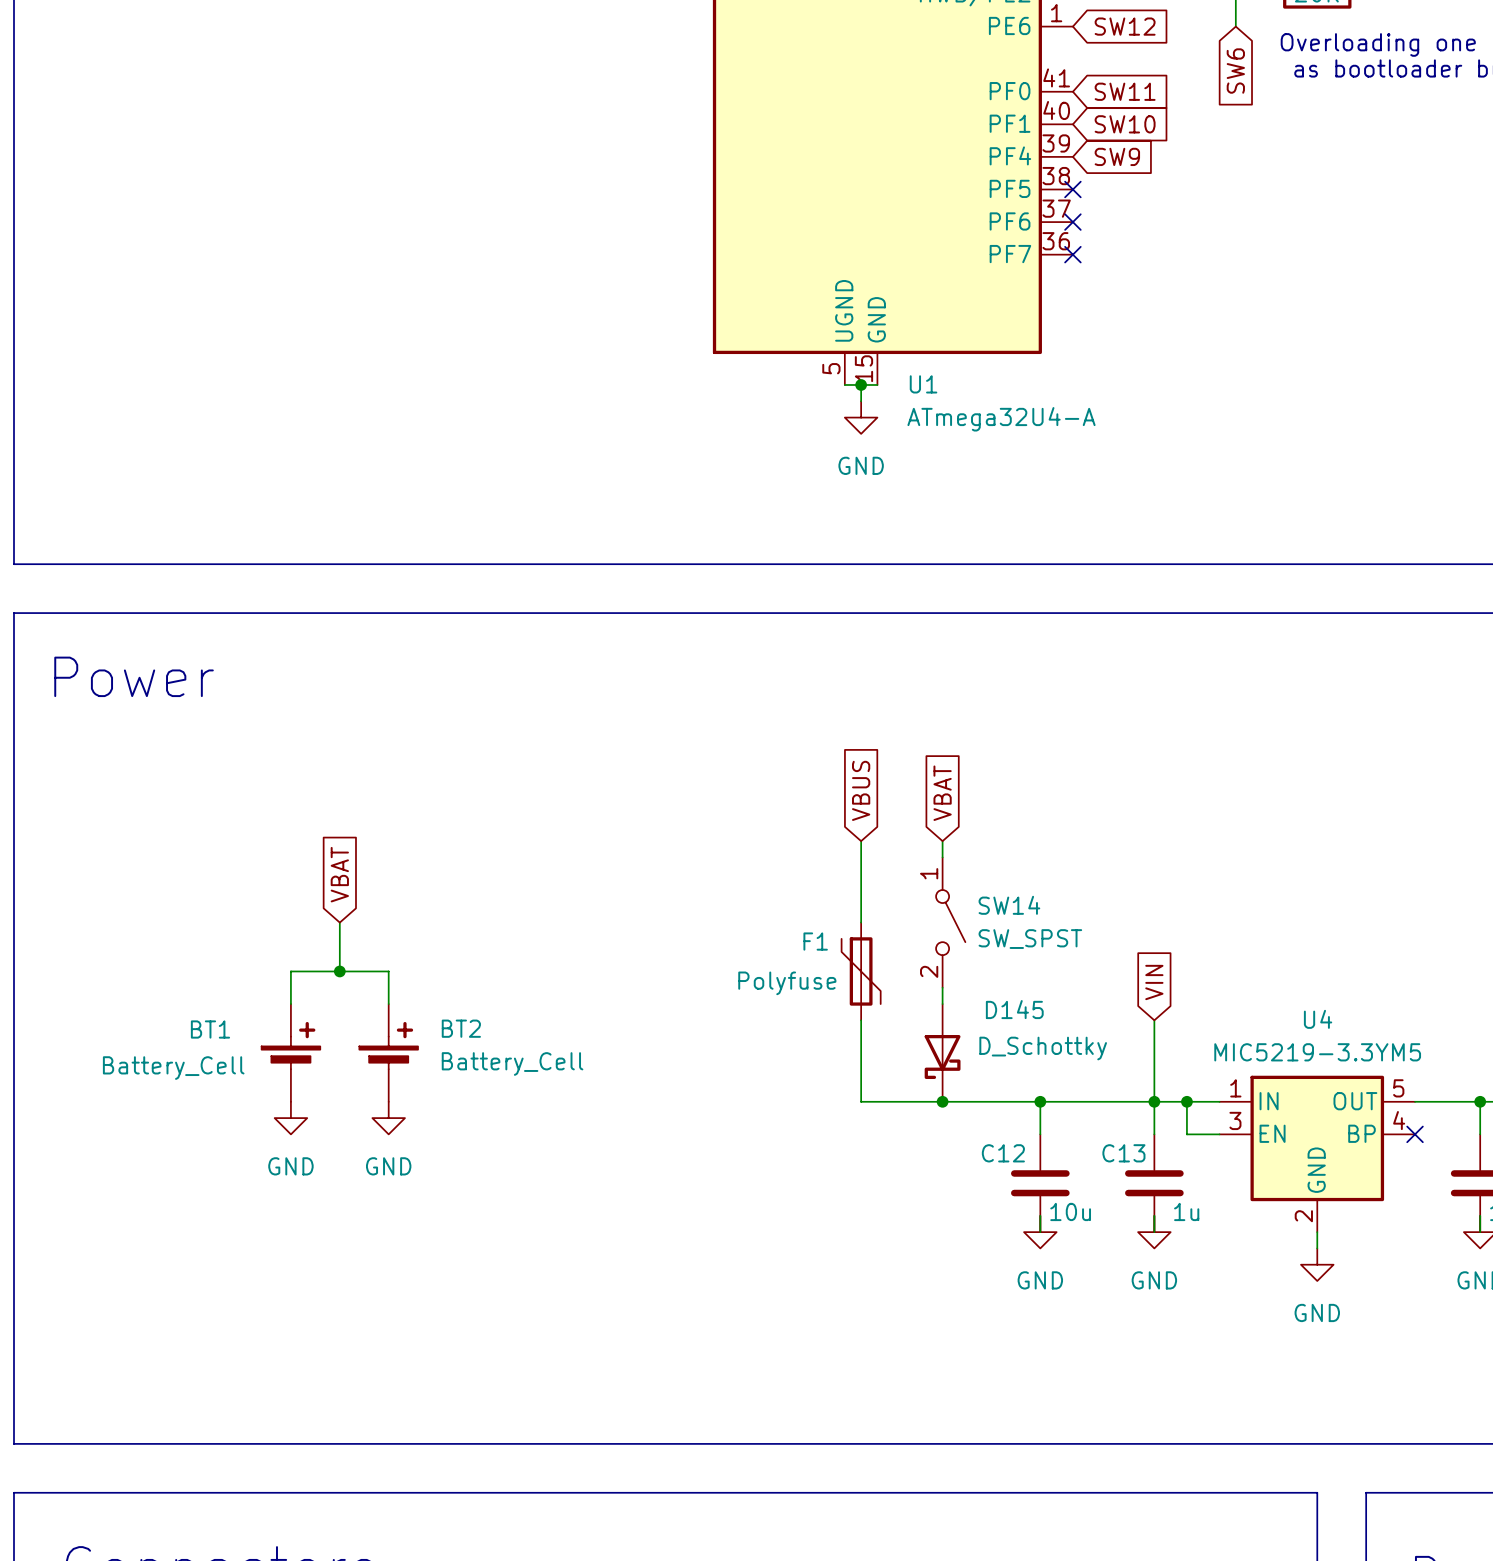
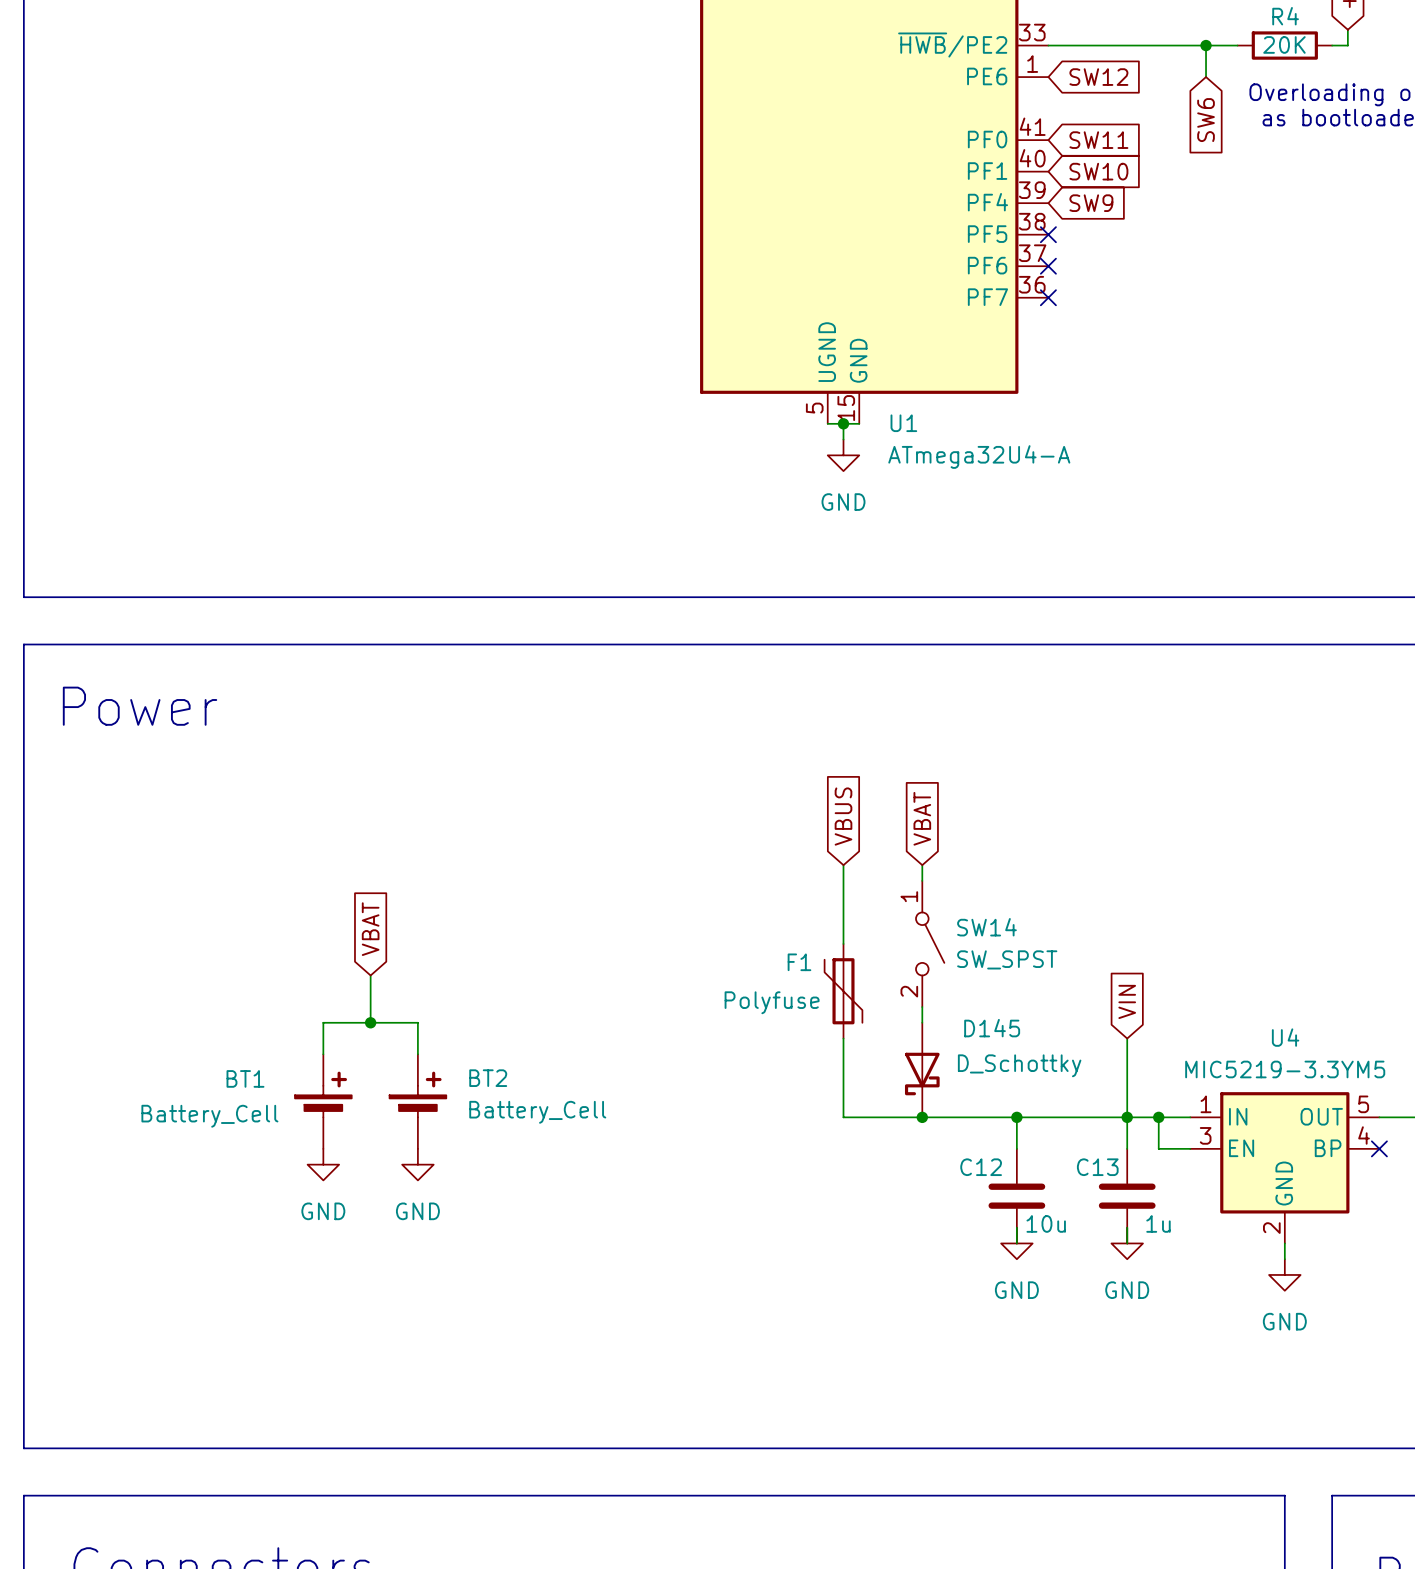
global label position: VBAT (339, 874) -> VBAT (370, 929)
wire: (339, 922) (339, 971) -> (370, 975) (370, 1022)
junction position: (339, 971) -> (370, 1022)
wire: (290, 1004) (290, 971) (388, 971) (388, 1004) -> (323, 1054) (323, 1022) (417, 1022) (417, 1054)
BT1 position: (290, 1052) -> (323, 1101)
BT2 position: (388, 1052) -> (417, 1101)
power symbol: GND (290, 1118) -> none
power symbol: GND (388, 1118) -> none
power symbol: none -> GND (323, 1164)
power symbol: none -> GND (417, 1164)

